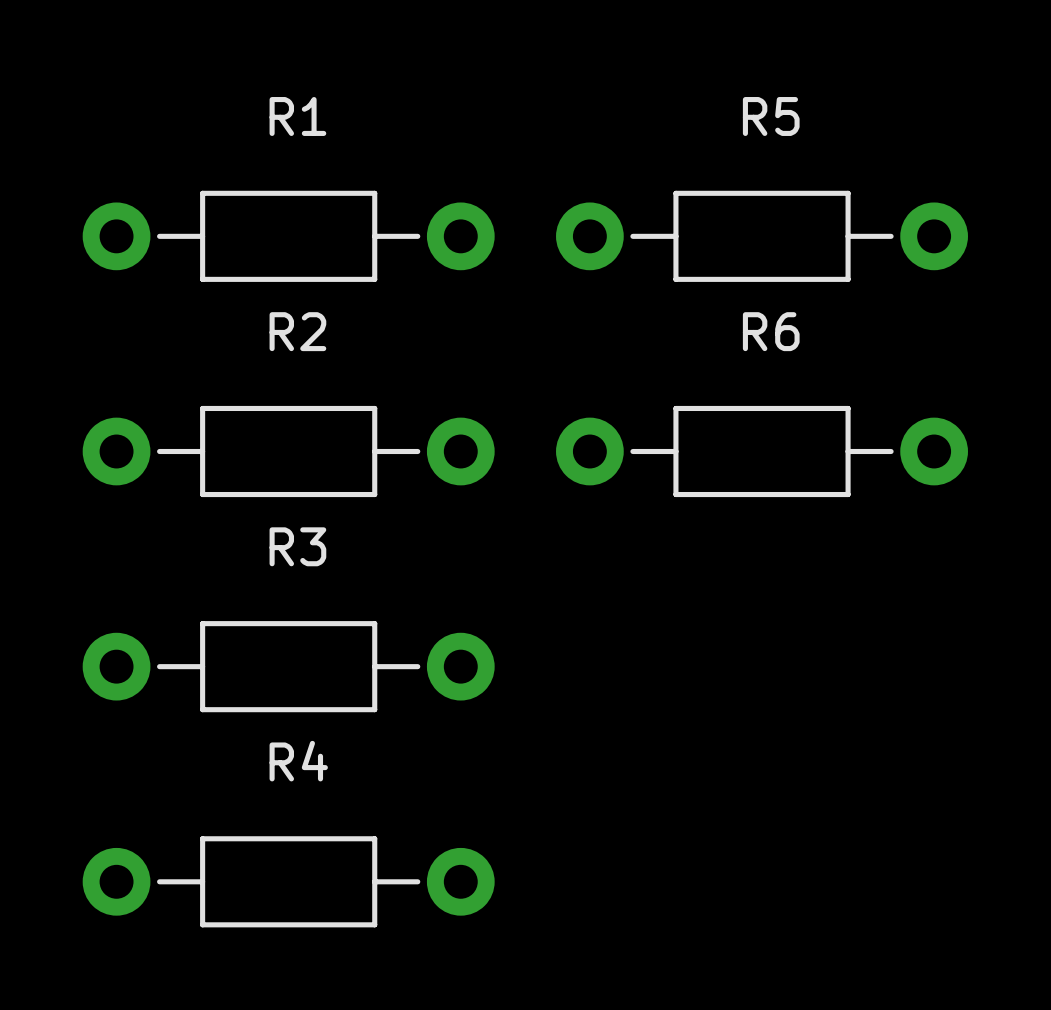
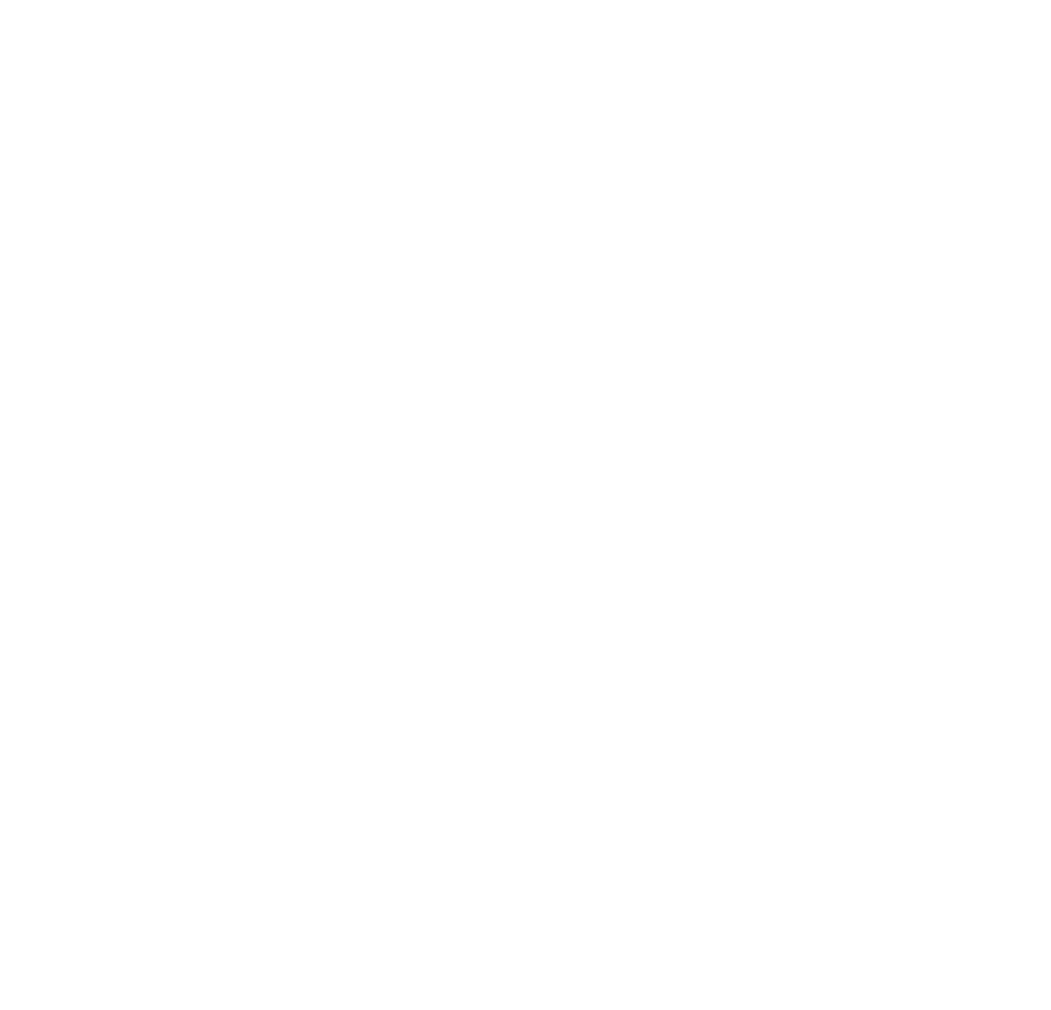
R1: (288, 236) -> none
R5: (762, 236) -> none
R2: (288, 451) -> none
R6: (762, 451) -> none
R3: (288, 666) -> none
R4: (288, 881) -> none

